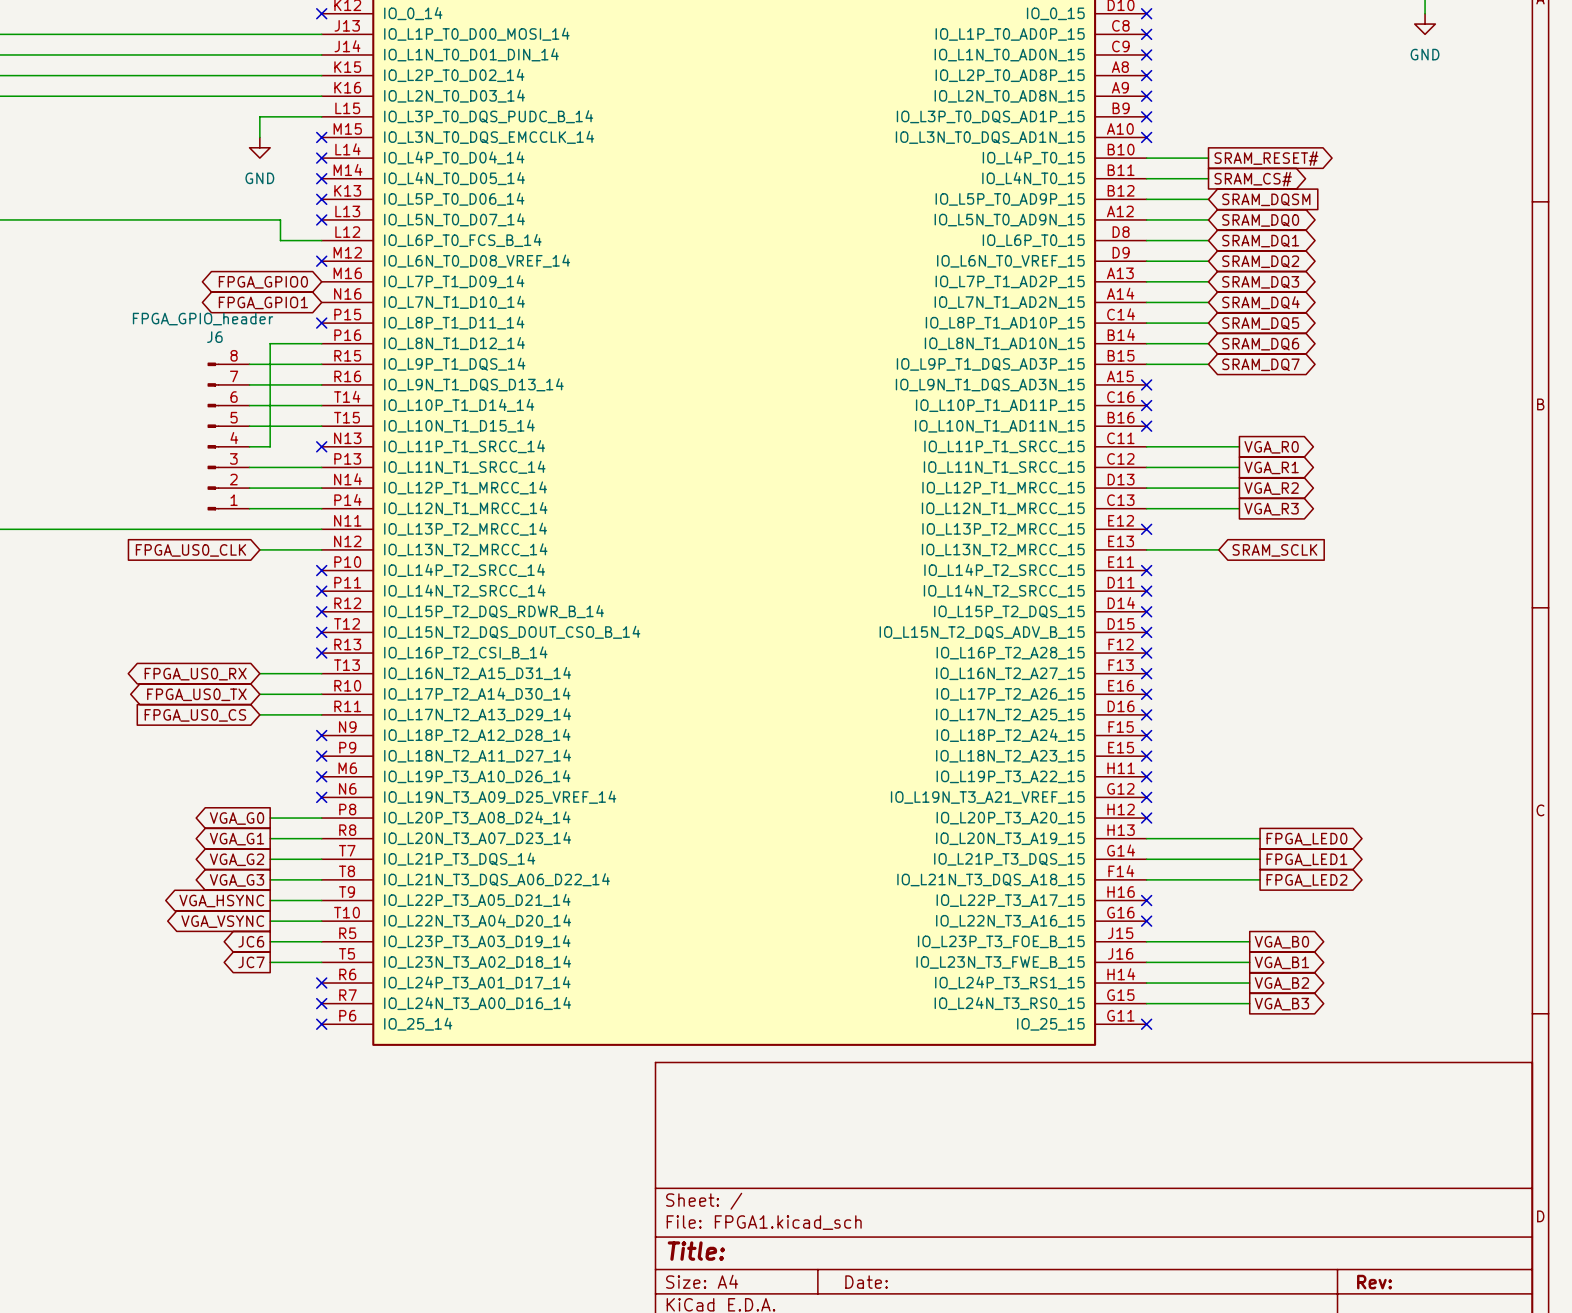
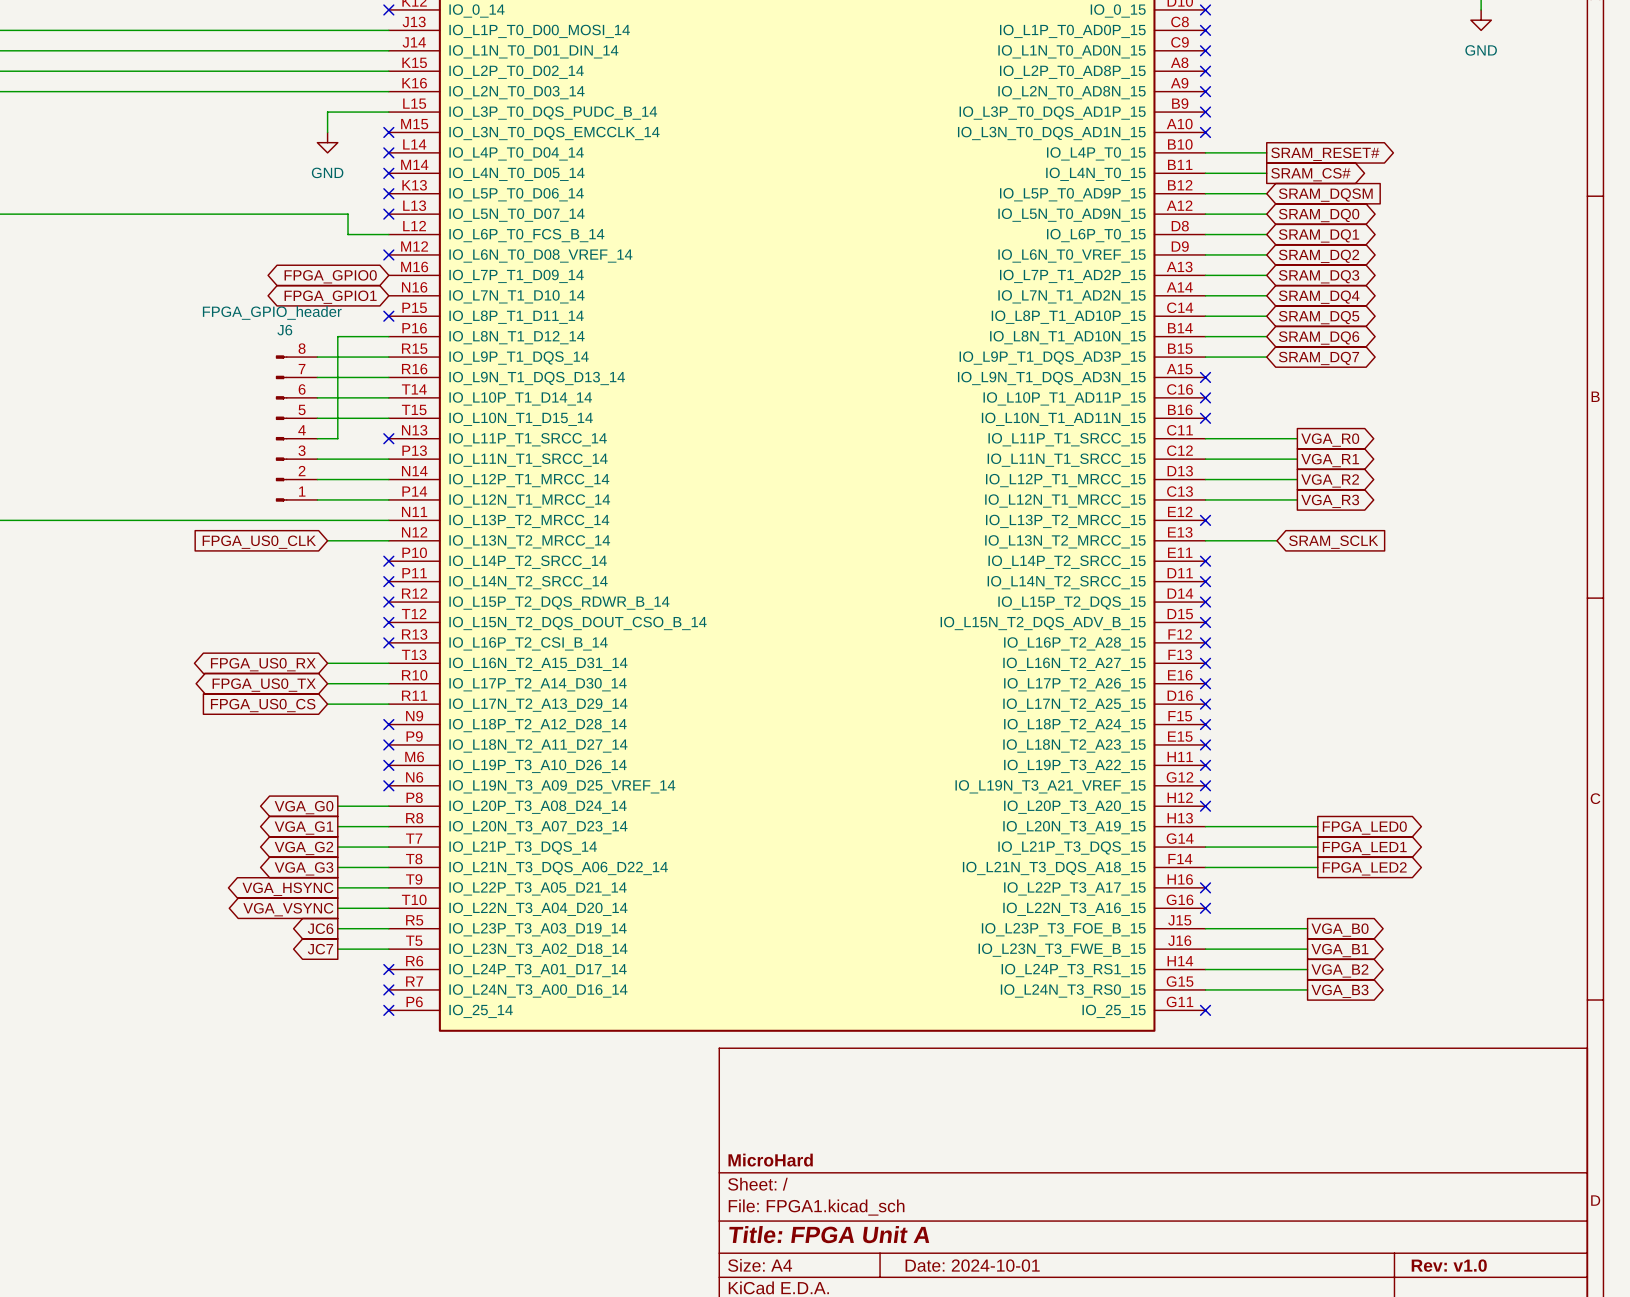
title block: none -> MicroHard (770, 1160)
title block: Title: (696, 1251) -> Title: FPGA Unit A (829, 1234)
title block: Date: (866, 1282) -> Date: 2024-10-01 (972, 1265)
title block: Rev: (1374, 1282) -> Rev: v1.0 (1449, 1265)

